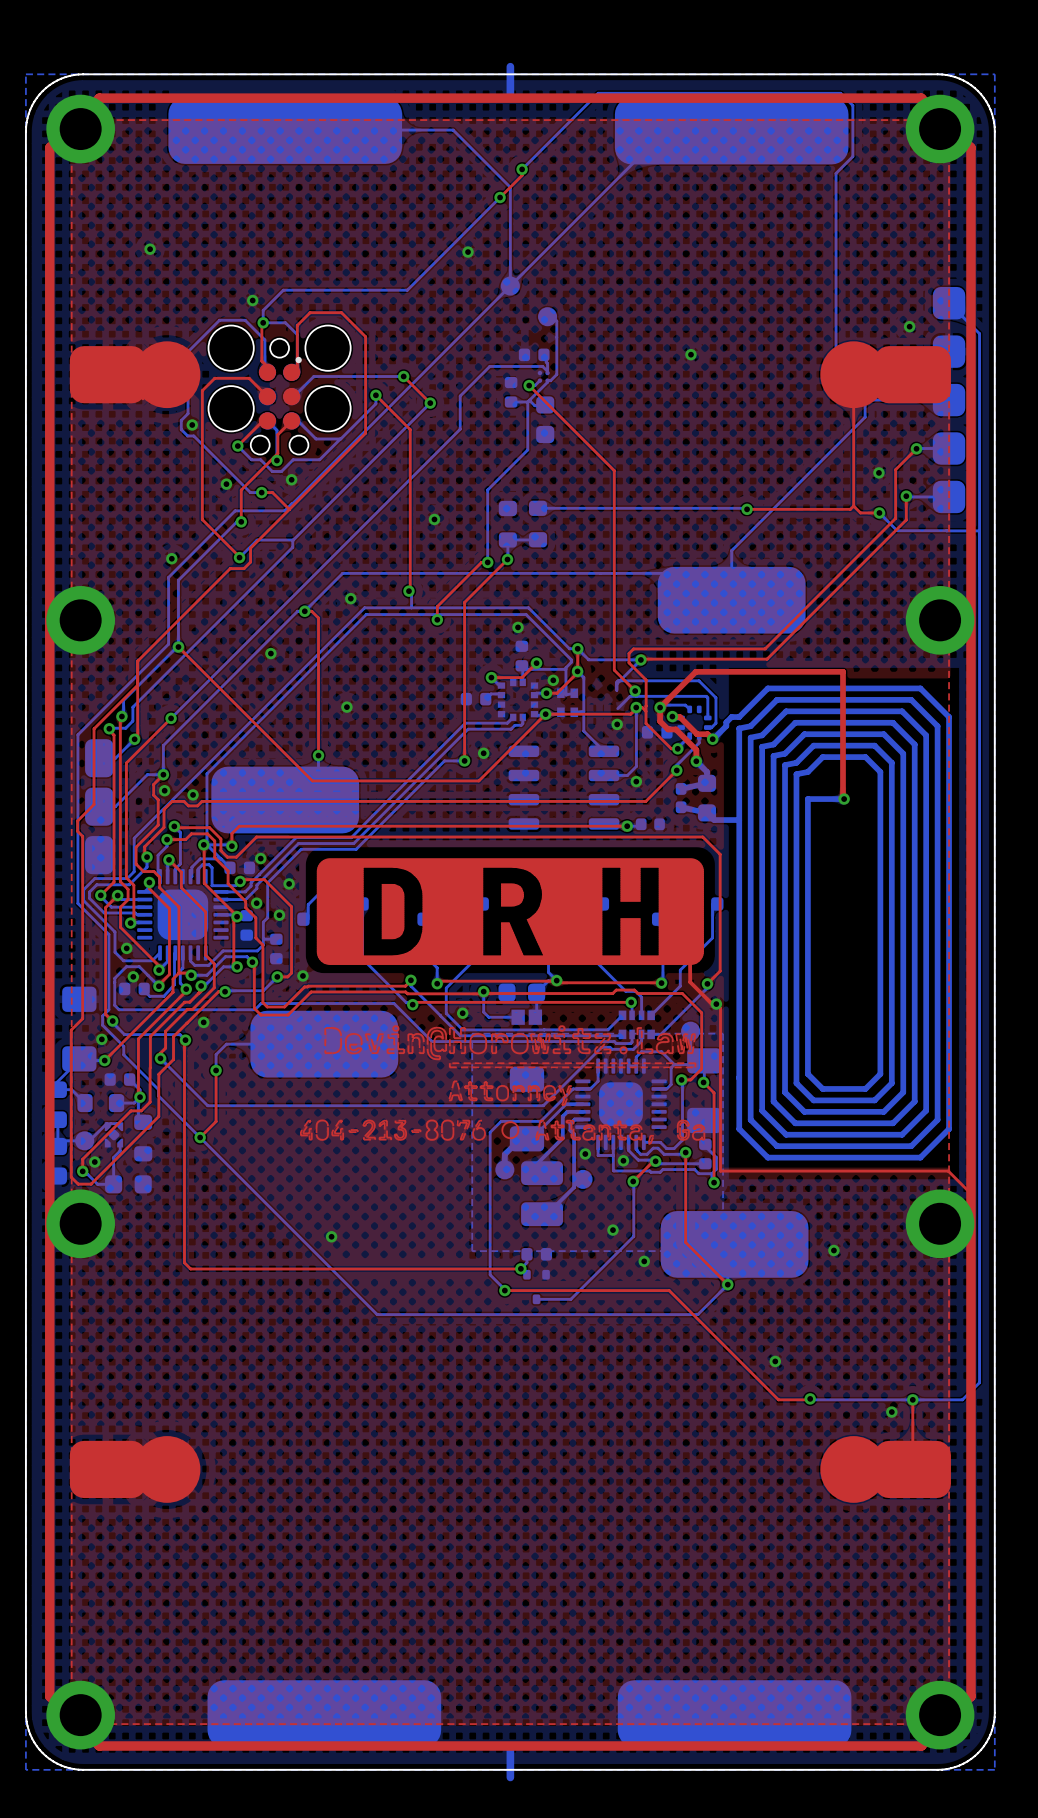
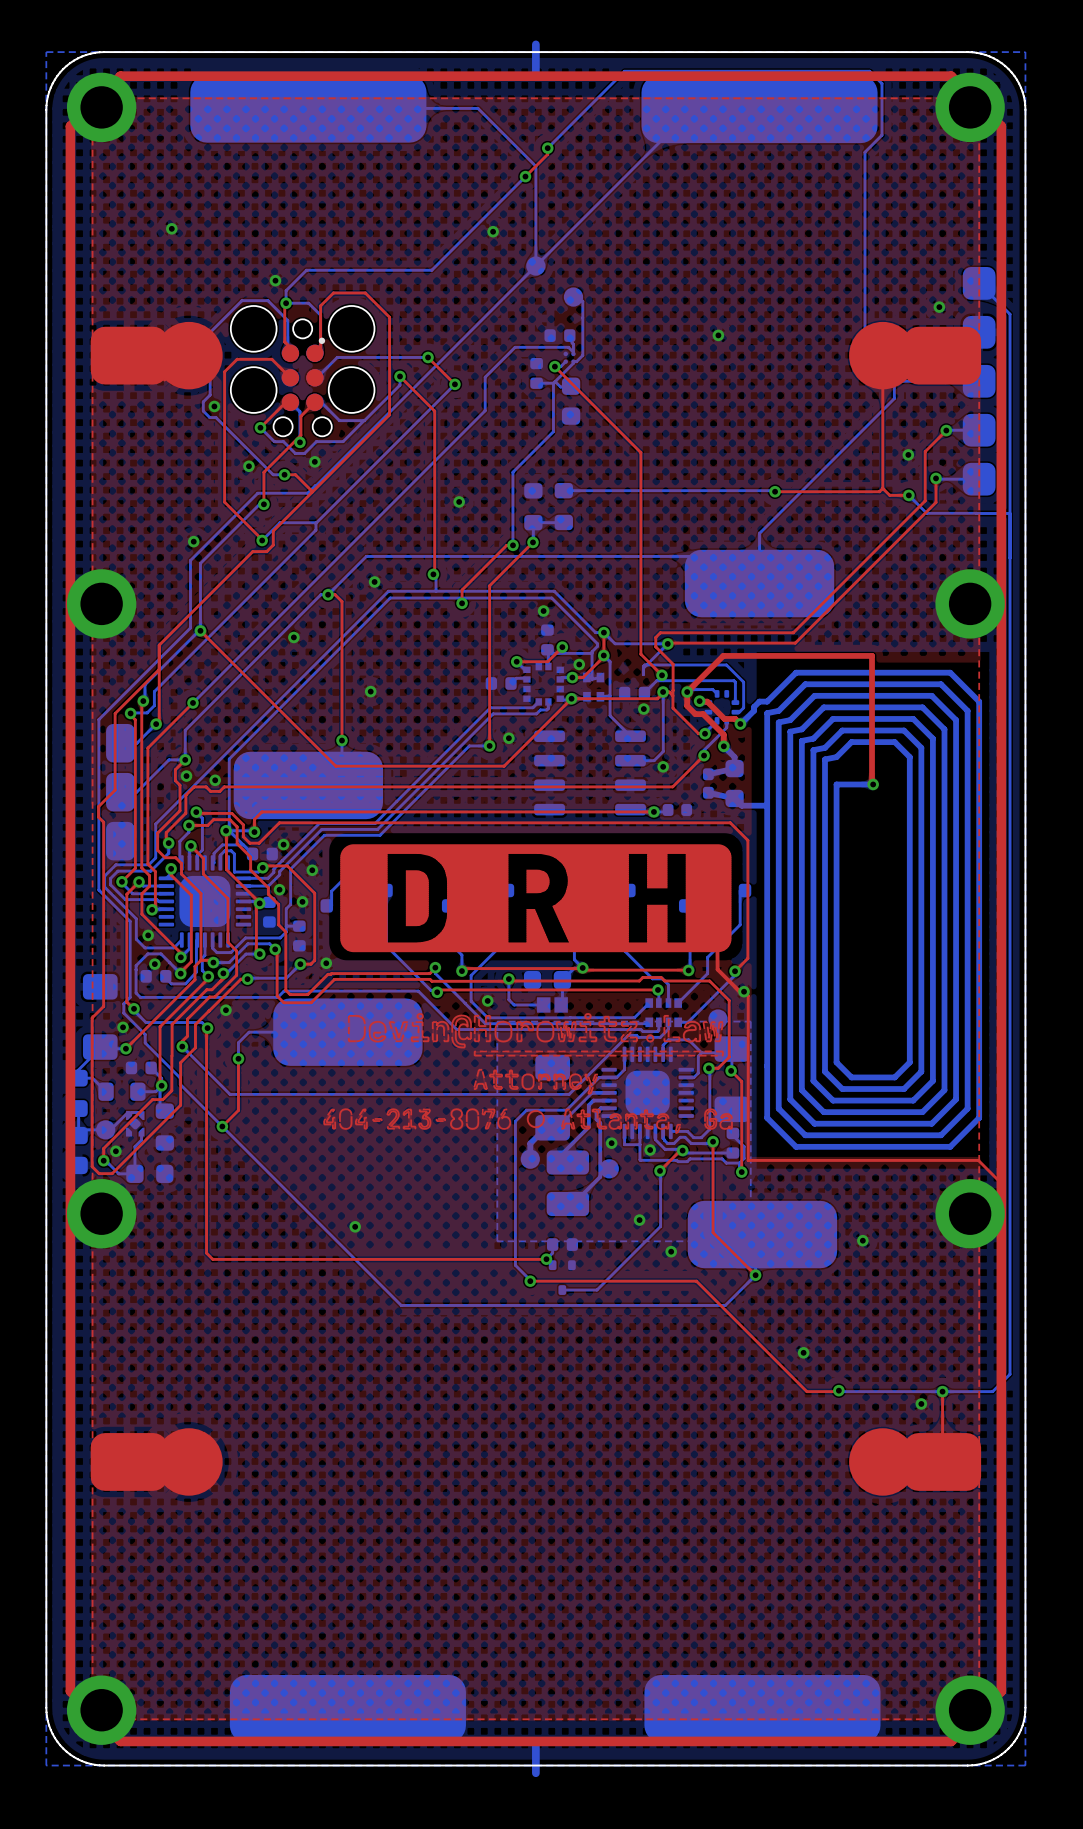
part position: (657, 732) -> (634, 693)

